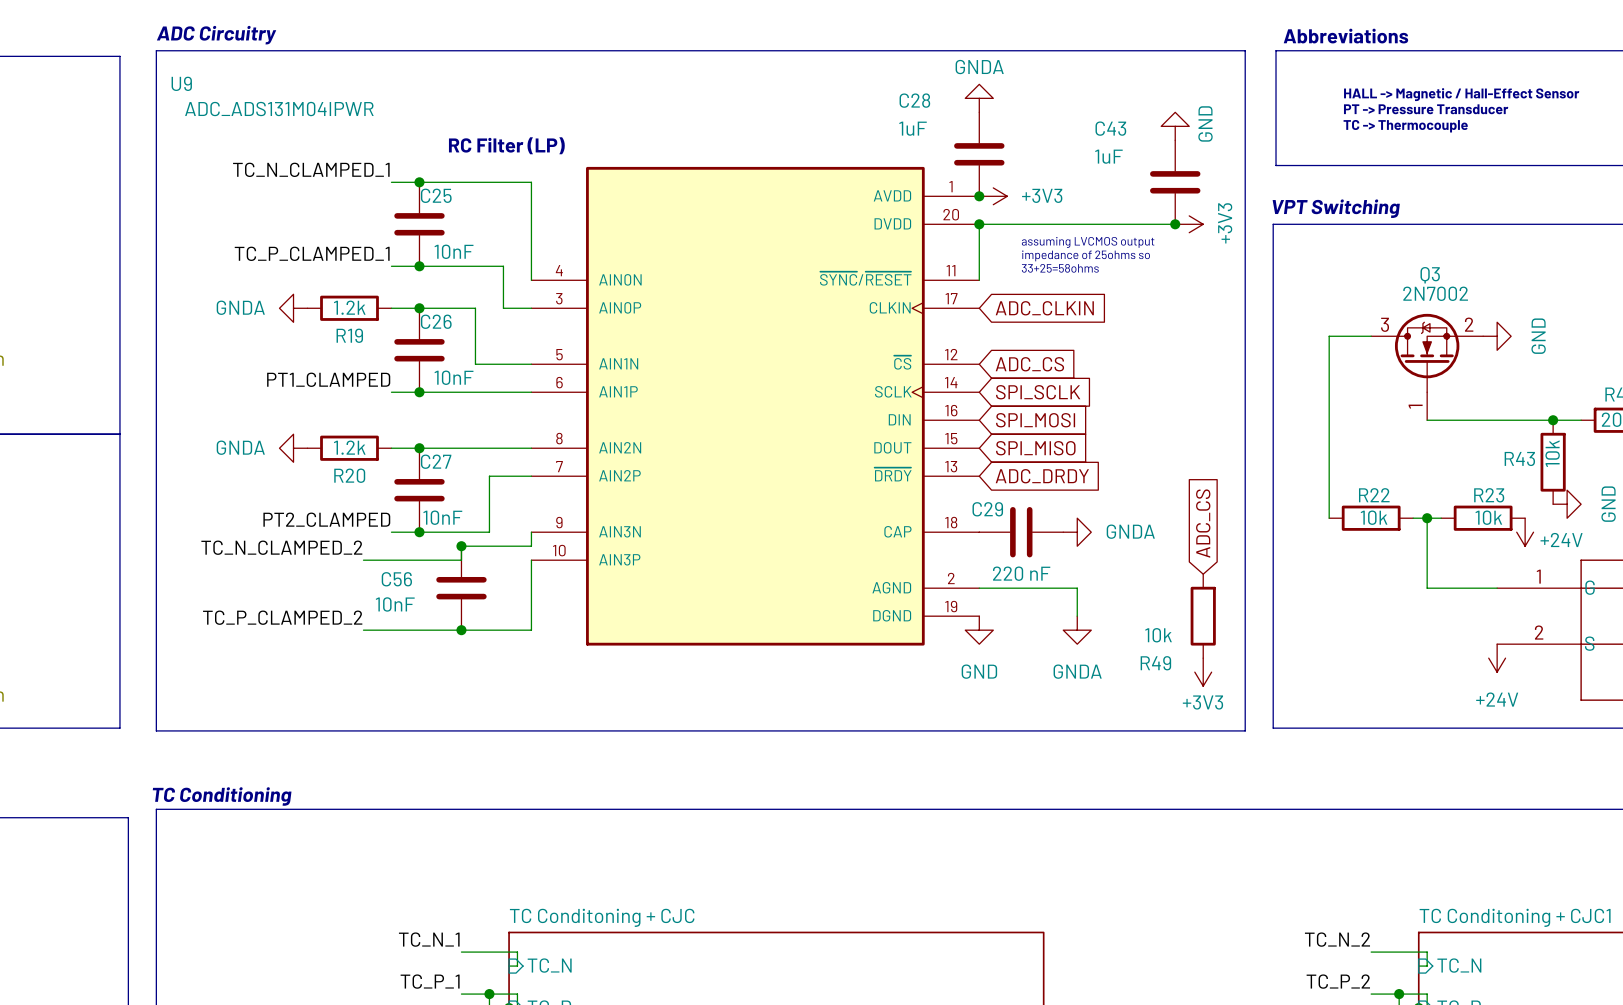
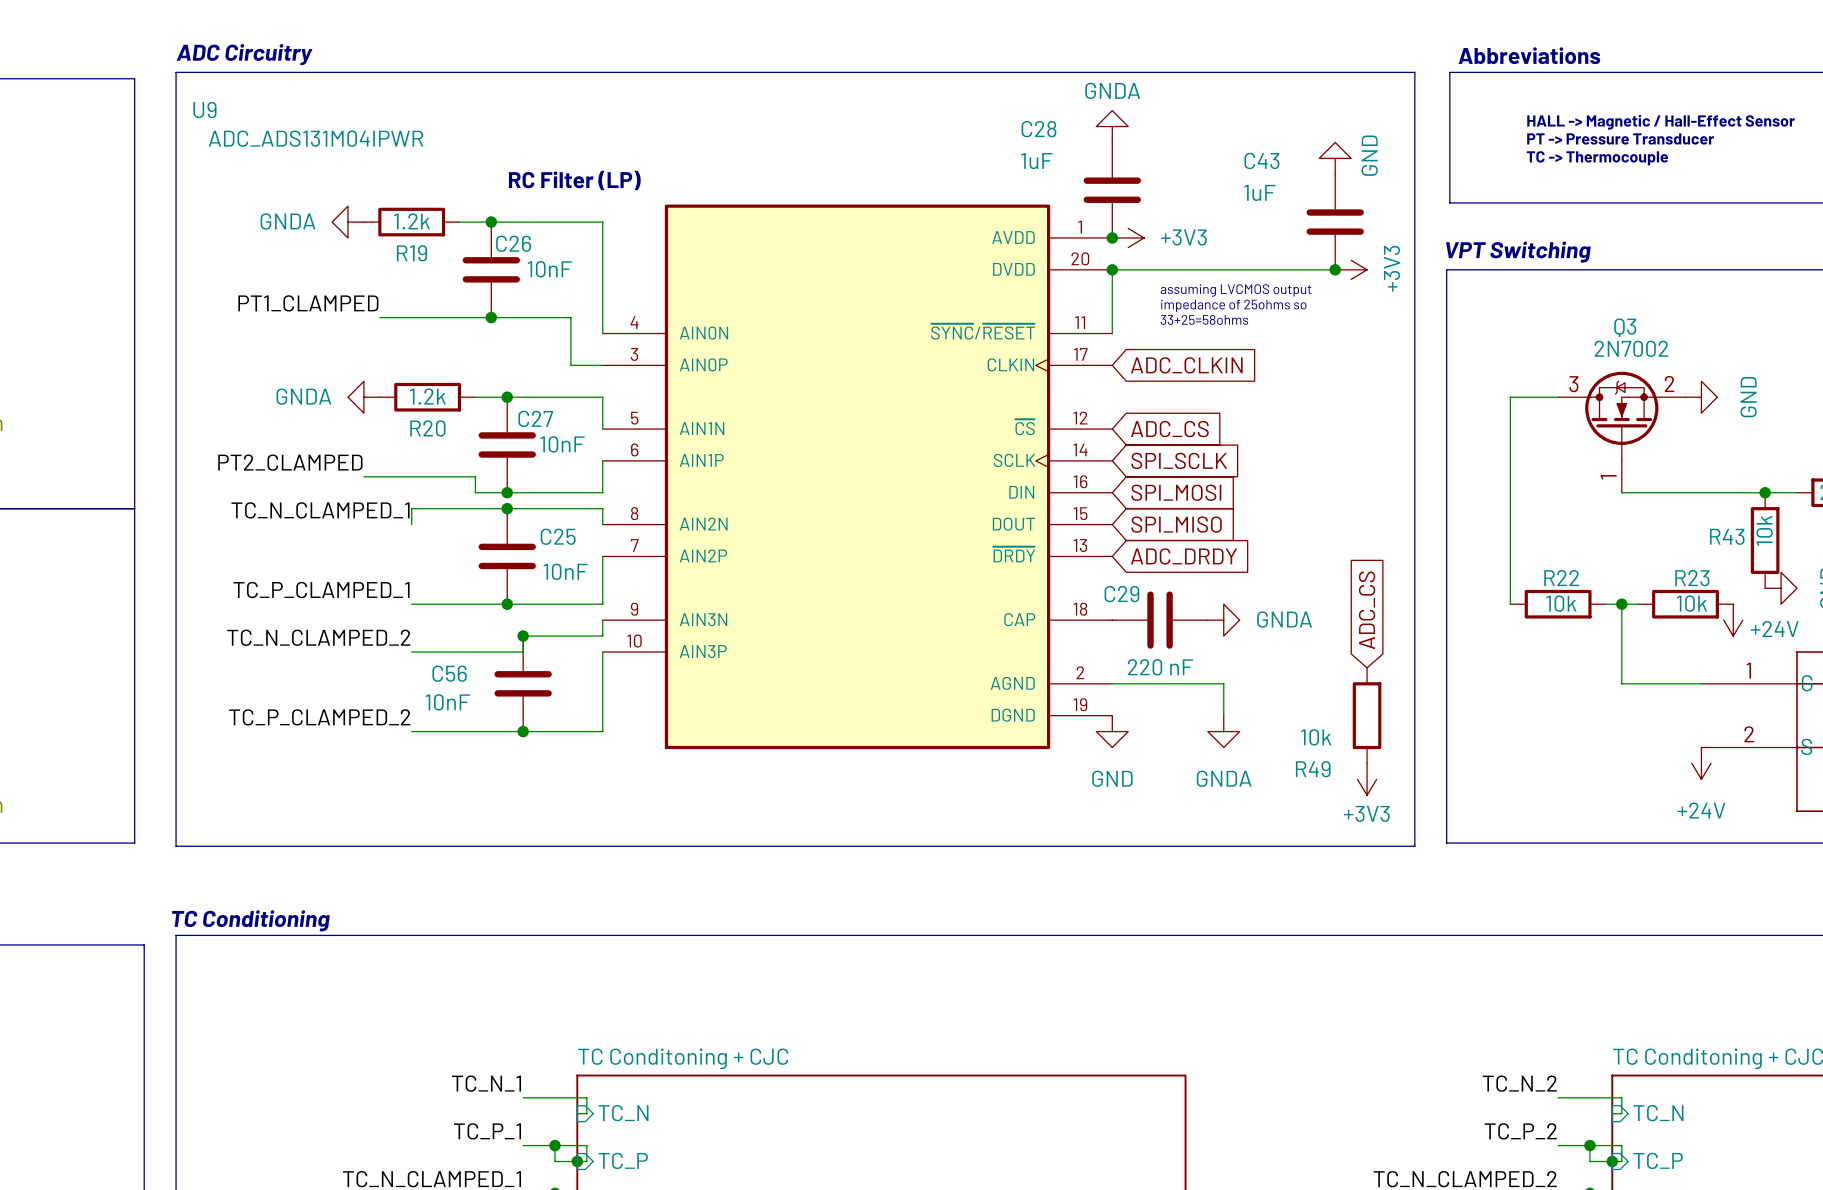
label position: TC_N_CLAMPED_1 (311, 169) -> TC_N_CLAMPED_1 (320, 510)
power symbol: none -> GNDA (348, 222)
junction position: (419, 182) -> (491, 222)
C25 name position: C25 (436, 195) -> C25 (558, 536)
C25 position: (419, 224) -> (507, 556)
C25 value position: 10nF (454, 251) -> 10nF (565, 571)
label position: TC_P_CLAMPED_1 (312, 253) -> TC_P_CLAMPED_1 (321, 590)
wire: none -> (379, 317) (443, 317)
junction position: (419, 266) -> (491, 317)
power symbol position: GNDA (293, 308) -> GNDA (363, 397)
R19 position: (349, 308) -> (411, 222)
wire: (391, 308) (475, 308) (475, 364) (531, 364) -> (475, 397) (602, 397) (602, 429)
junction: (419, 308) -> none
C26 name position: C26 (436, 321) -> C26 (513, 243)
junction: none -> (507, 397)
C26 position: (419, 350) -> (491, 269)
C26 value position: 10nF (454, 377) -> 10nF (549, 269)
label position: PT1_CLAMPED (328, 379) -> PT1_CLAMPED (308, 303)
wire: (391, 392) (531, 392) -> (363, 476) (475, 476) (475, 492) (602, 492) (602, 460)
junction: (419, 392) -> none
junction: none -> (507, 492)
junction: none -> (507, 508)
power symbol: GNDA (293, 448) -> none
R20 position: (349, 448) -> (427, 397)
wire: (391, 448) (531, 448) -> (411, 524) (411, 508) (602, 508) (602, 524)
junction: (419, 448) -> none
C27 name position: C27 (436, 461) -> C27 (535, 418)
wire: (531, 476) (489, 476) (489, 532) (391, 532) -> (602, 556) (602, 604) (411, 604)
C27 position: (419, 490) -> (507, 444)
C27 value position: 10nF (442, 517) -> 10nF (562, 444)
label position: PT2_CLAMPED (326, 519) -> PT2_CLAMPED (290, 462)
junction position: (419, 532) -> (507, 604)

